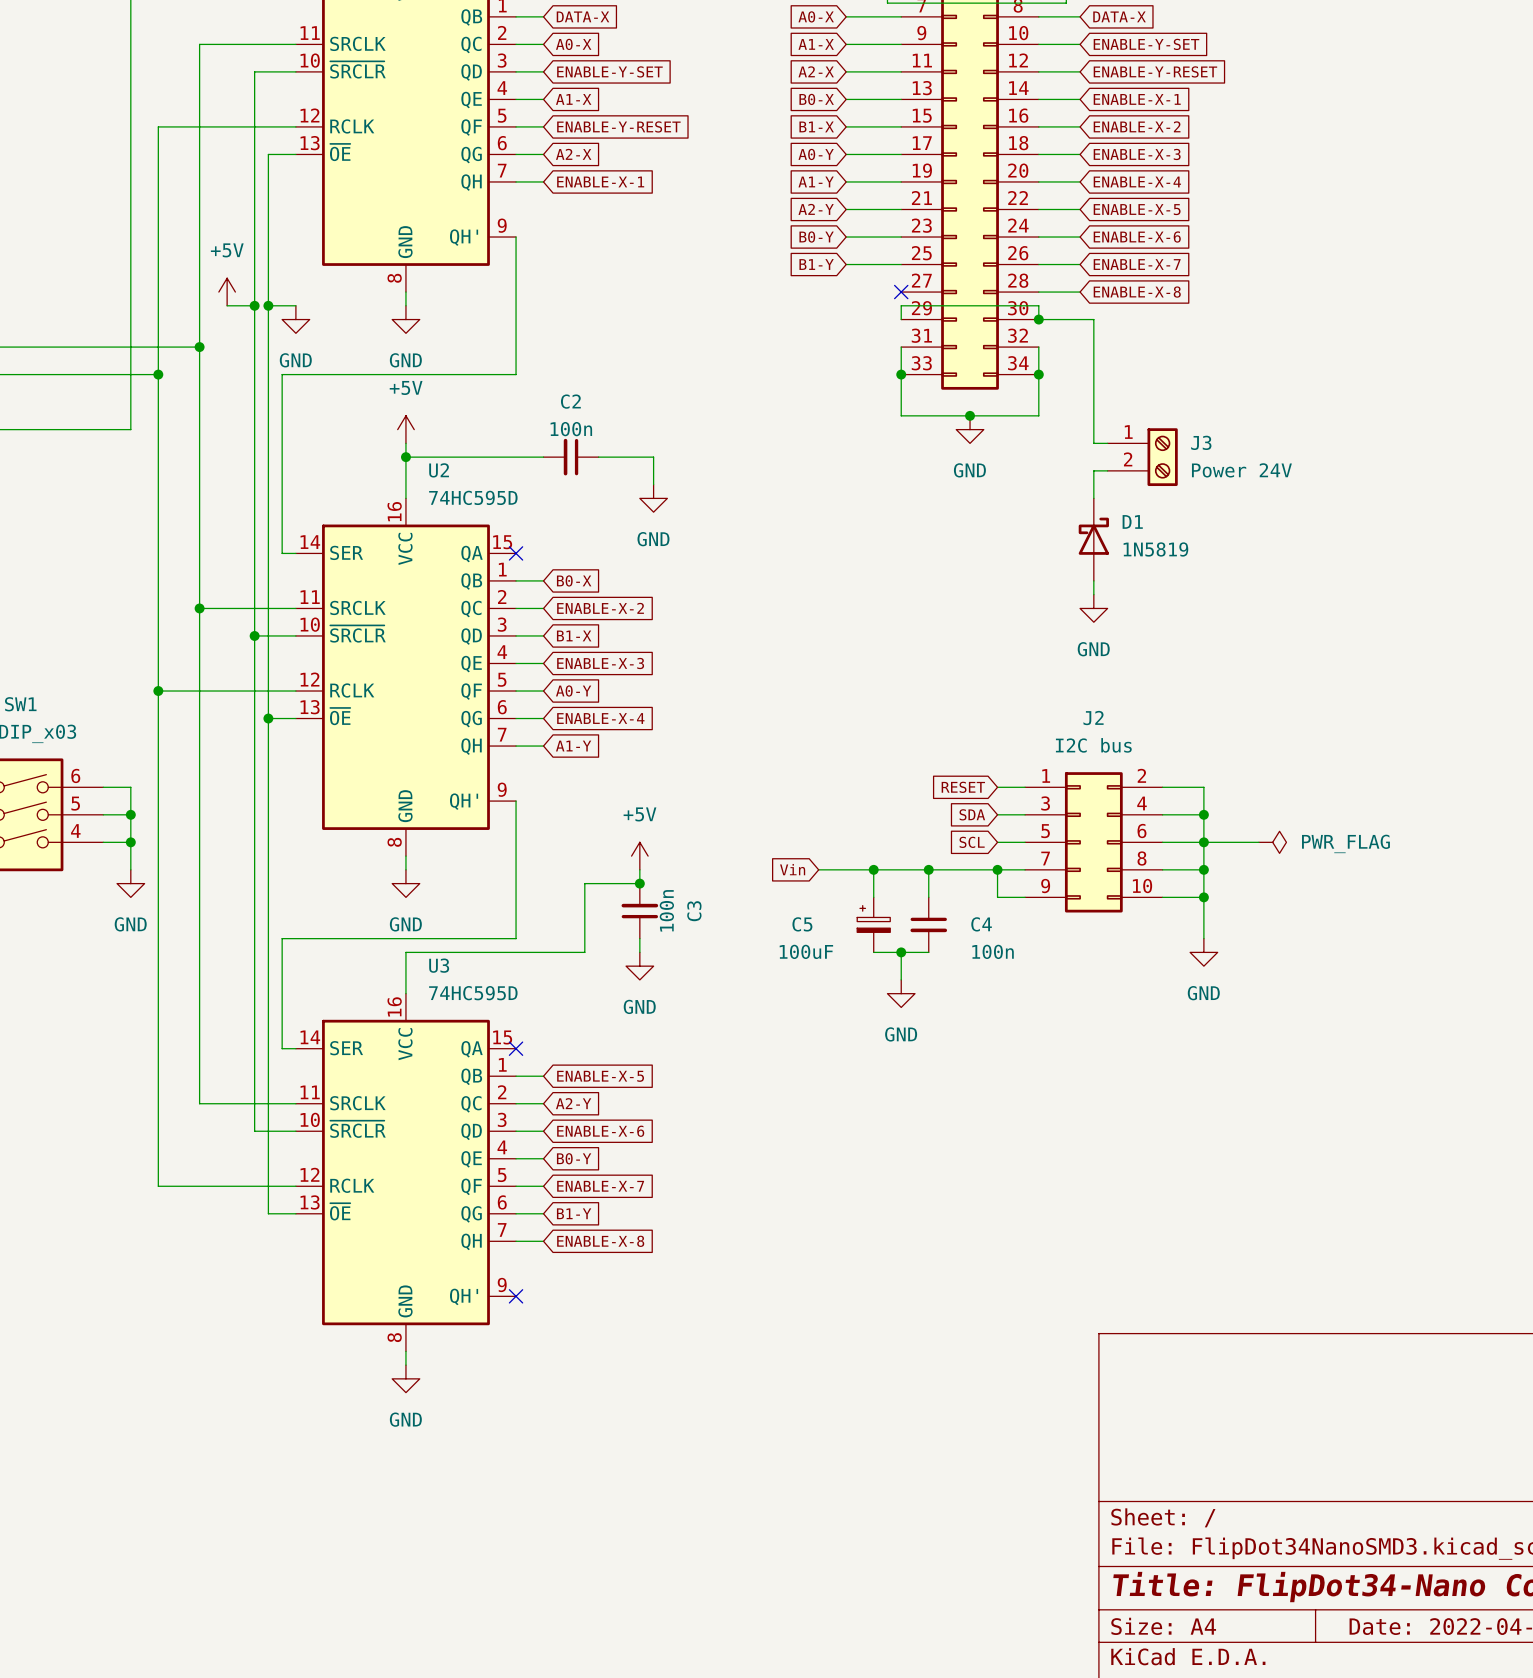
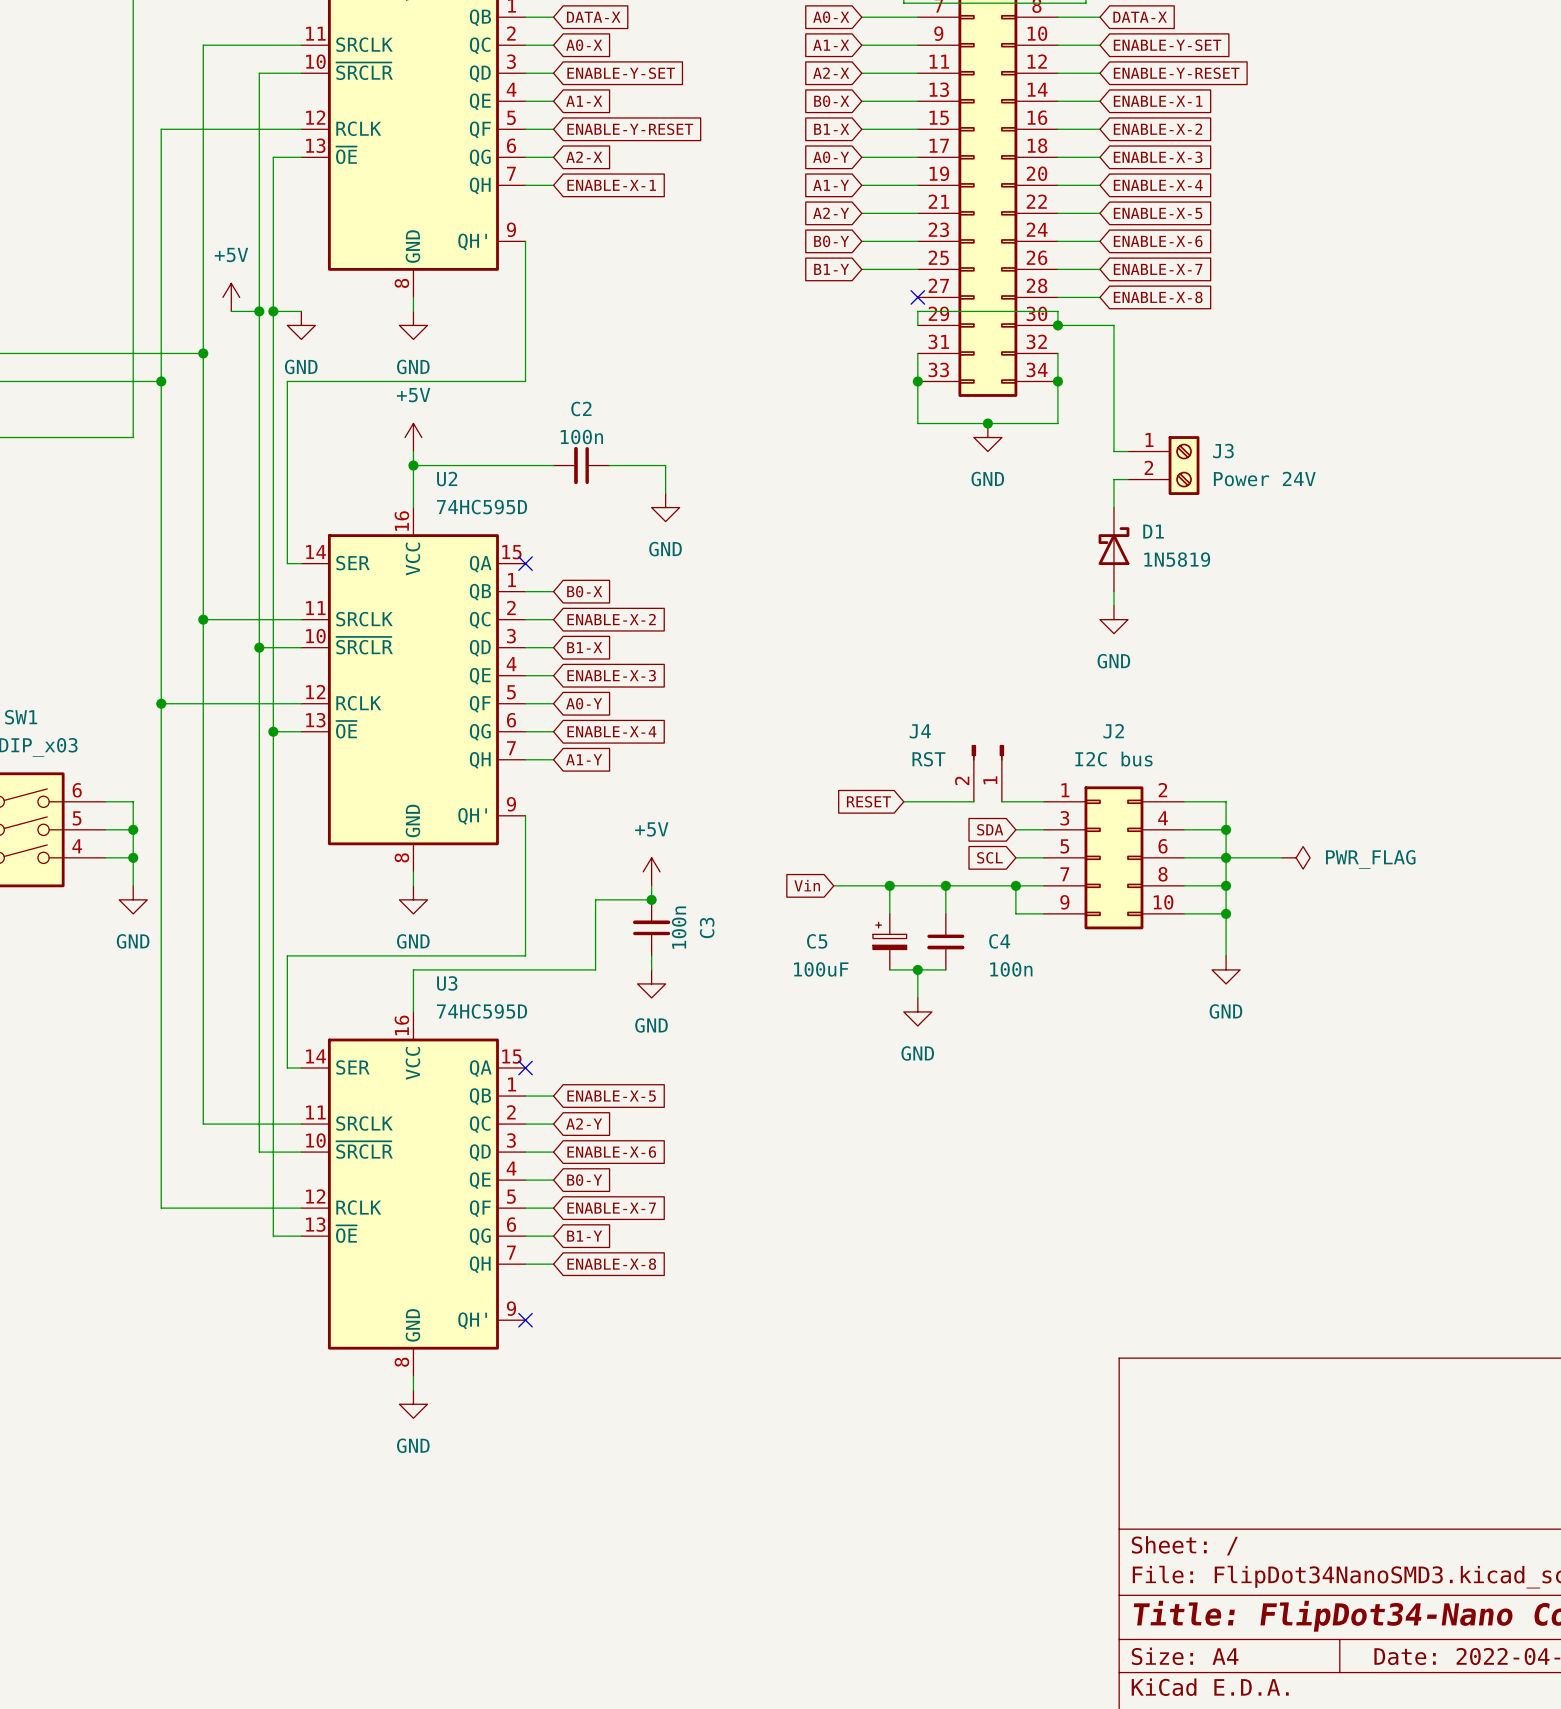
J4: none -> RST (987, 773)
wire: none -> (903, 801) (973, 801)
global label position: RESET (963, 787) -> RESET (868, 801)
wire: none -> (1001, 801) (1015, 801)

